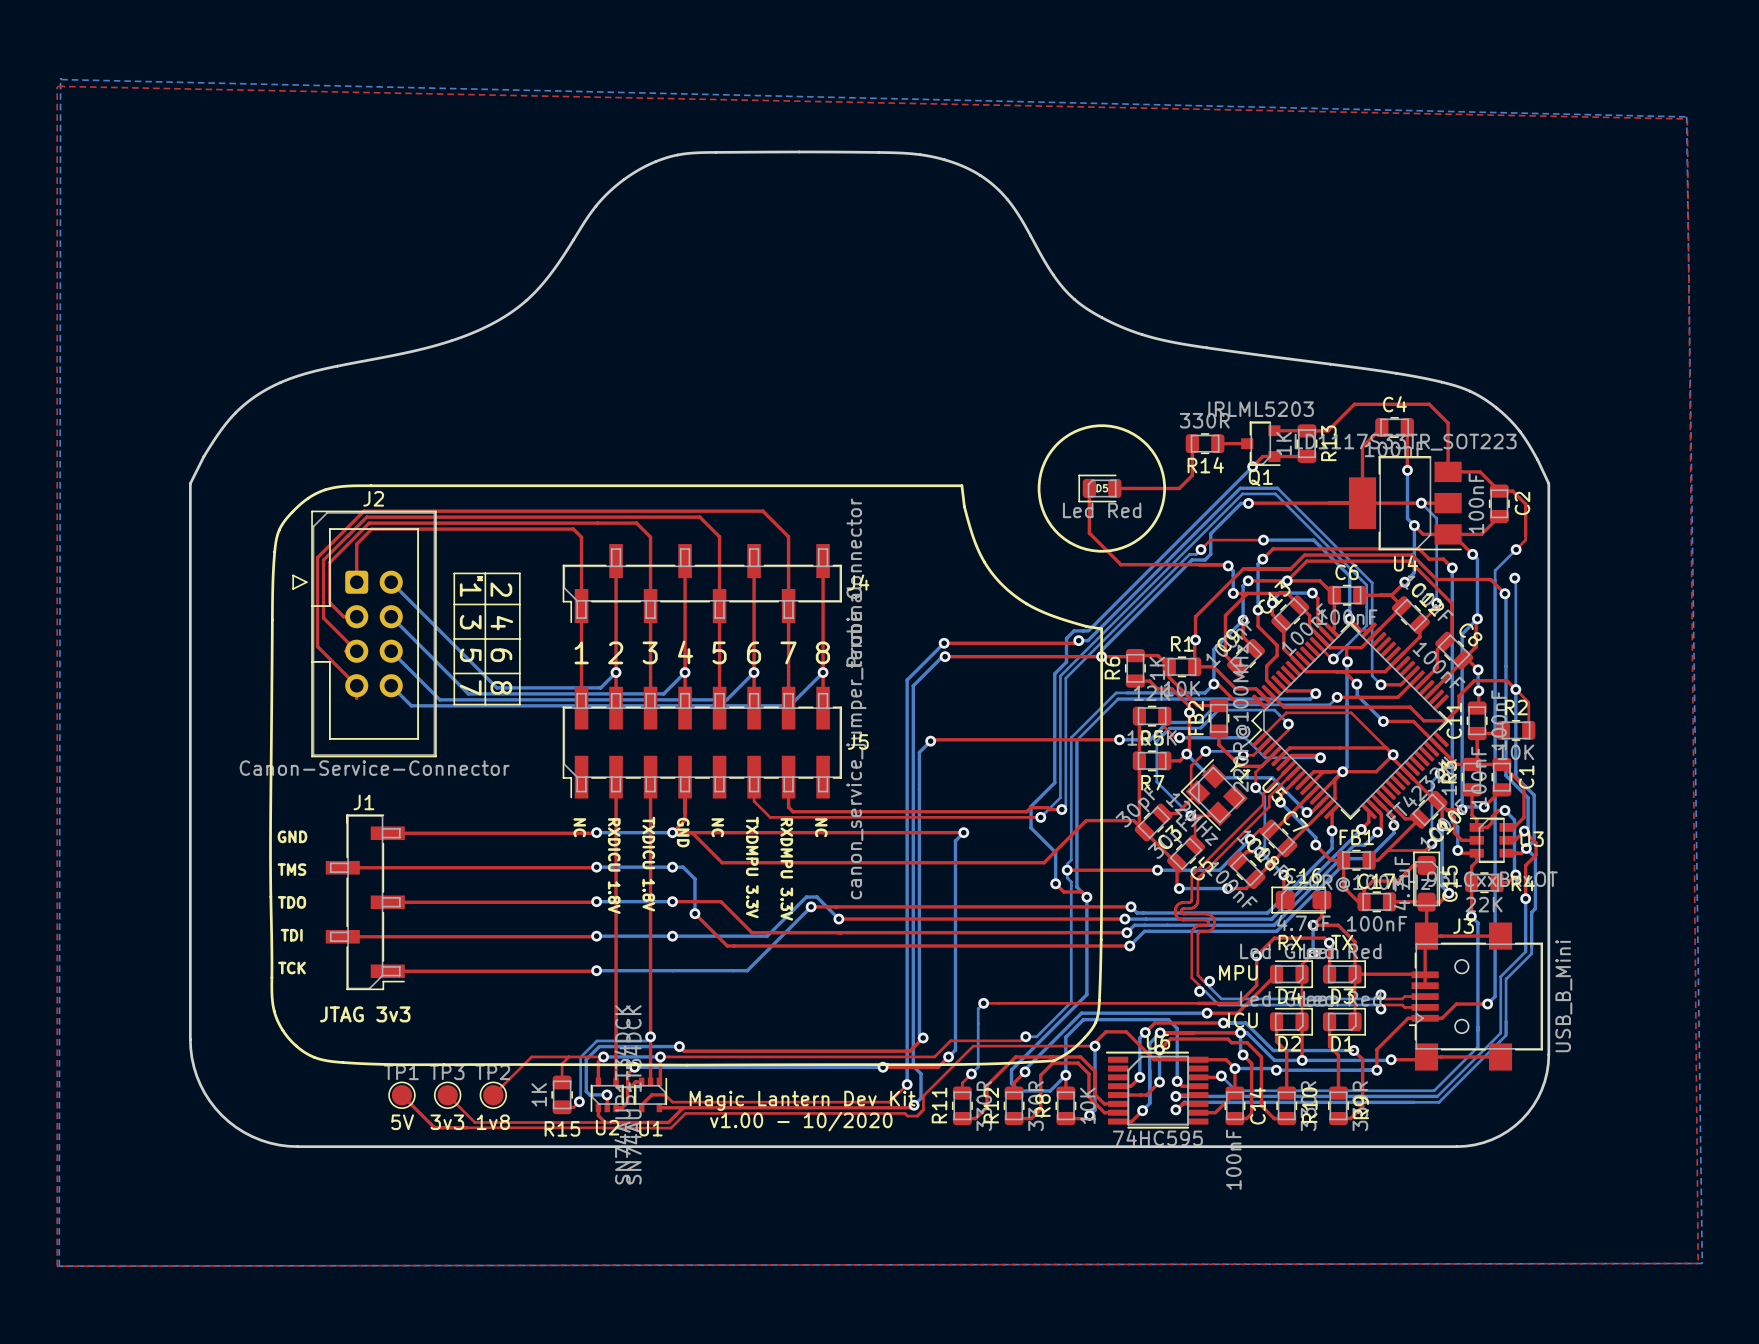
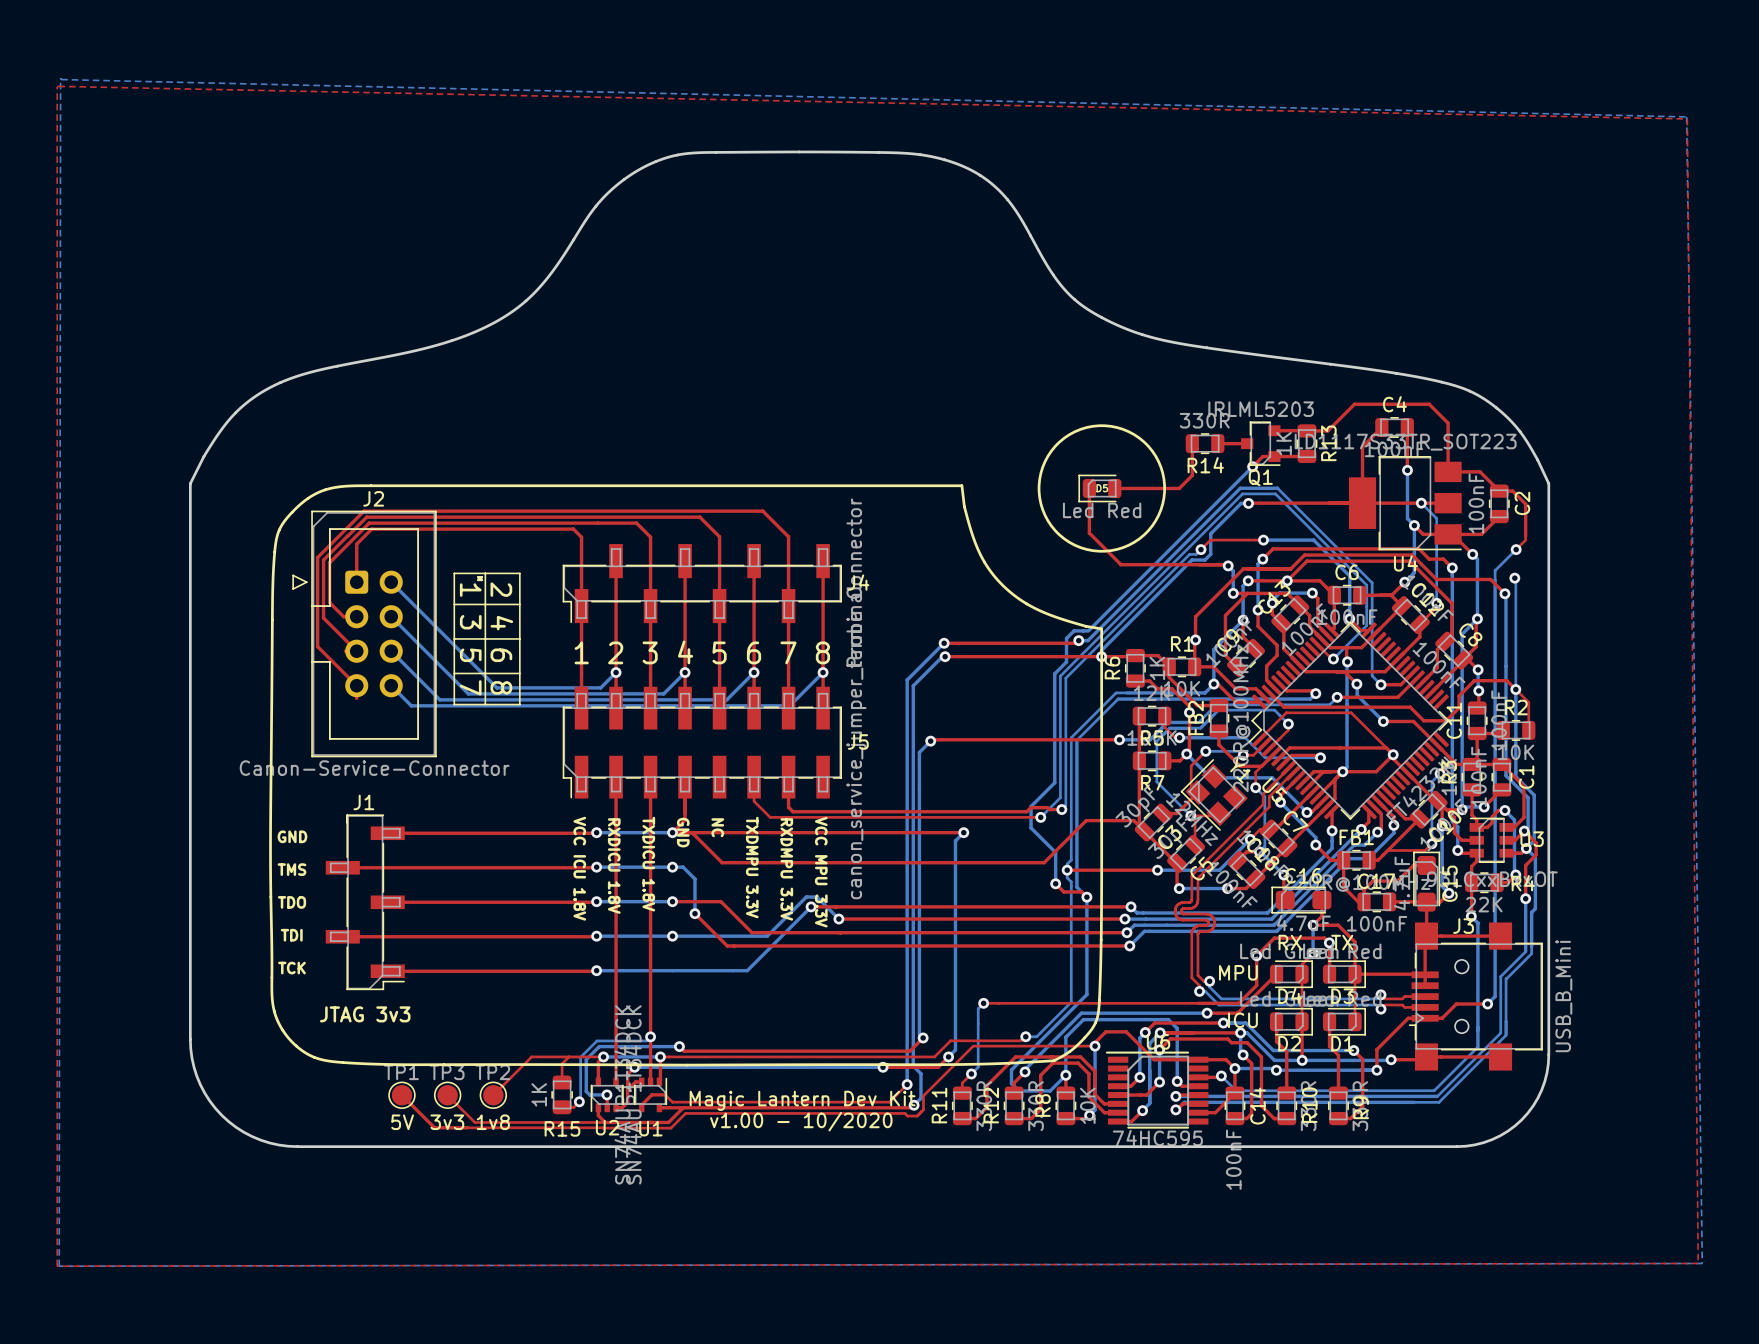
text: NC (579, 827) -> none
text: NC (821, 827) -> none
text: none -> VCC ICU 1.8V (579, 868)
text: none -> VCC MPU 3.3V (821, 872)

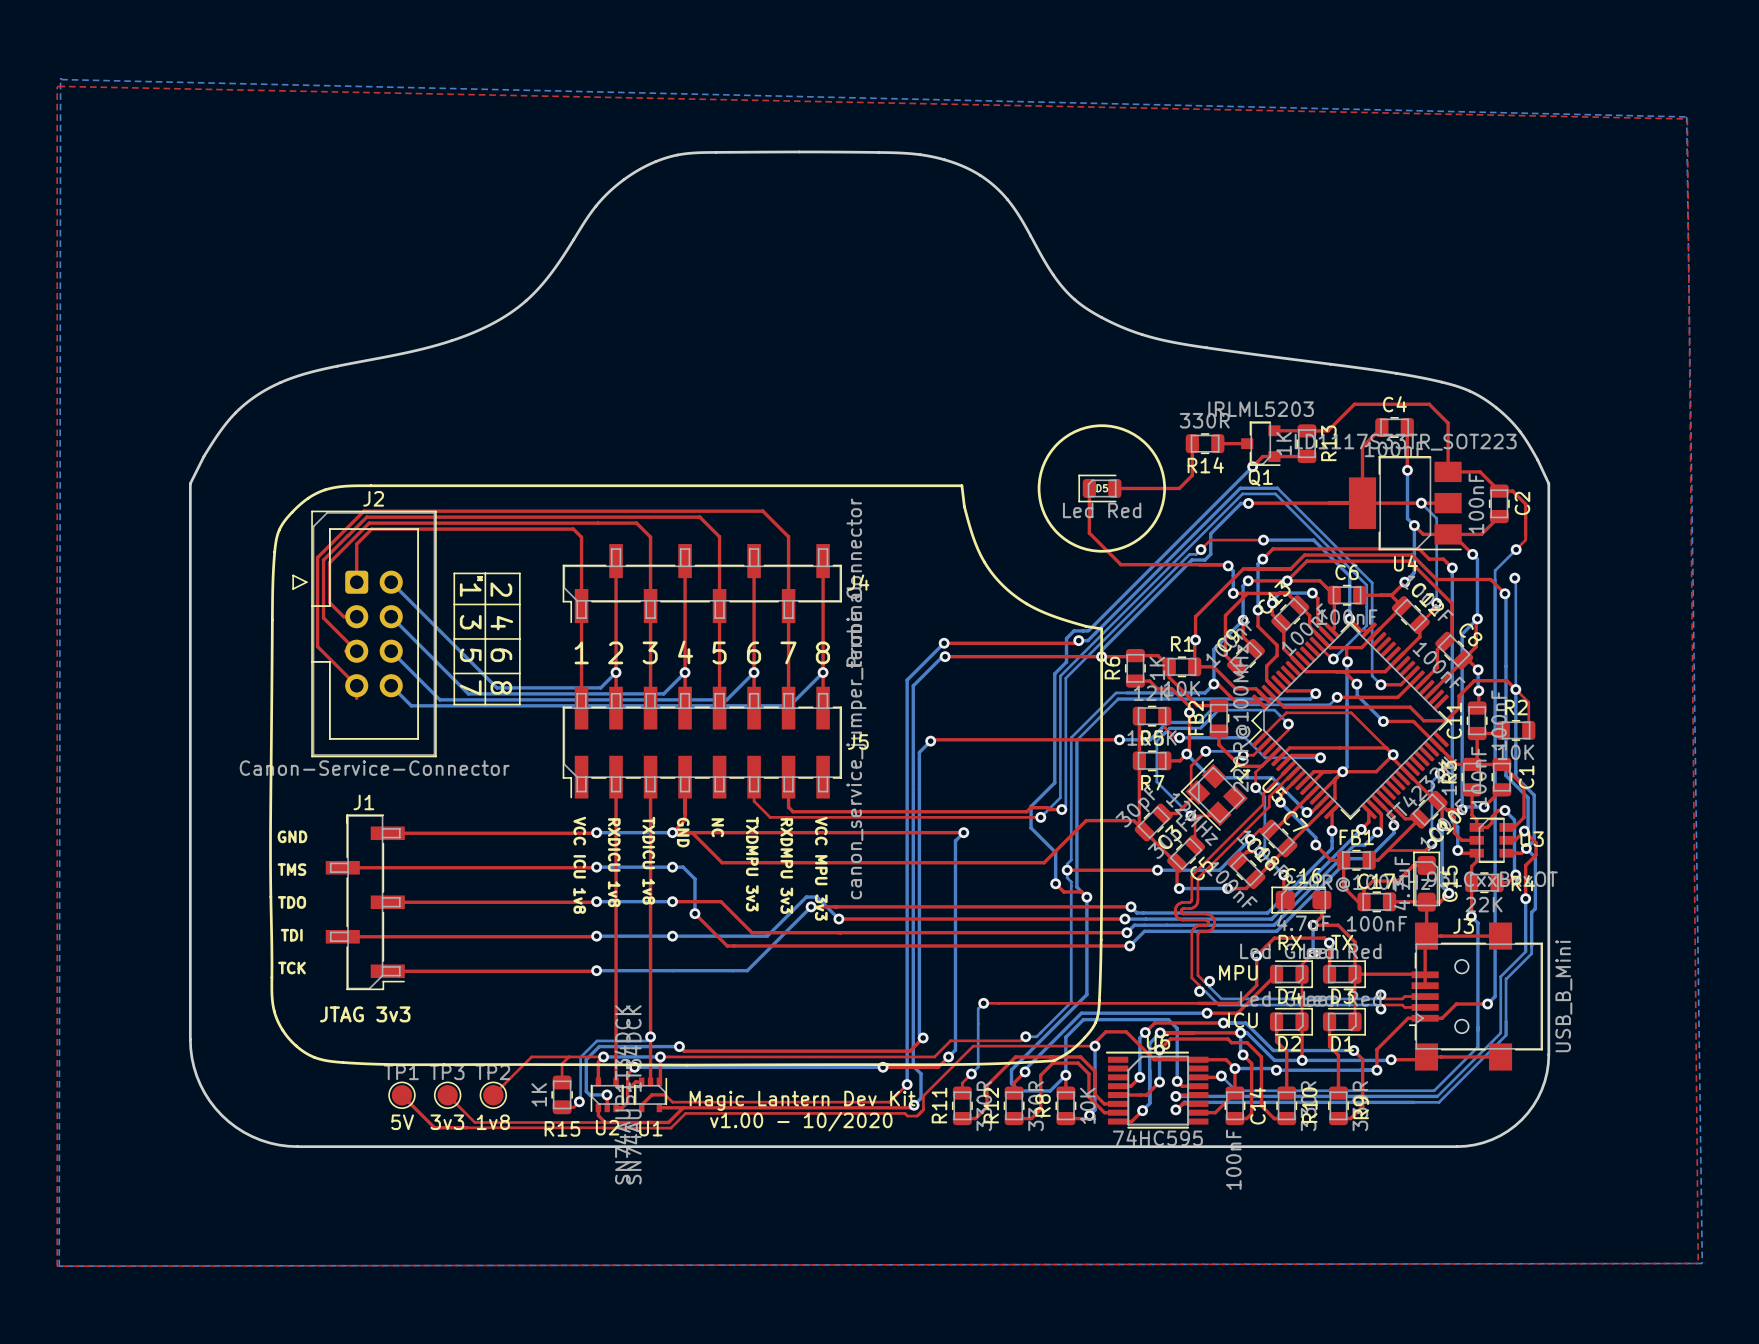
text: TXDICU 1.8V (648, 864) -> TXDICU 1v8 (648, 860)
text: RXDICU 1.8V (614, 866) -> RXDICU 1v8 (614, 862)
text: TXDMPU 3.3V (752, 867) -> TXDMPU 3v3 (752, 864)
text: VCC ICU 1.8V (579, 868) -> VCC ICU 1v8 (579, 865)
text: RXDMPU 3.3V (786, 869) -> RXDMPU 3v3 (786, 866)
text: VCC MPU 3.3V (821, 872) -> VCC MPU 3v3 (821, 868)

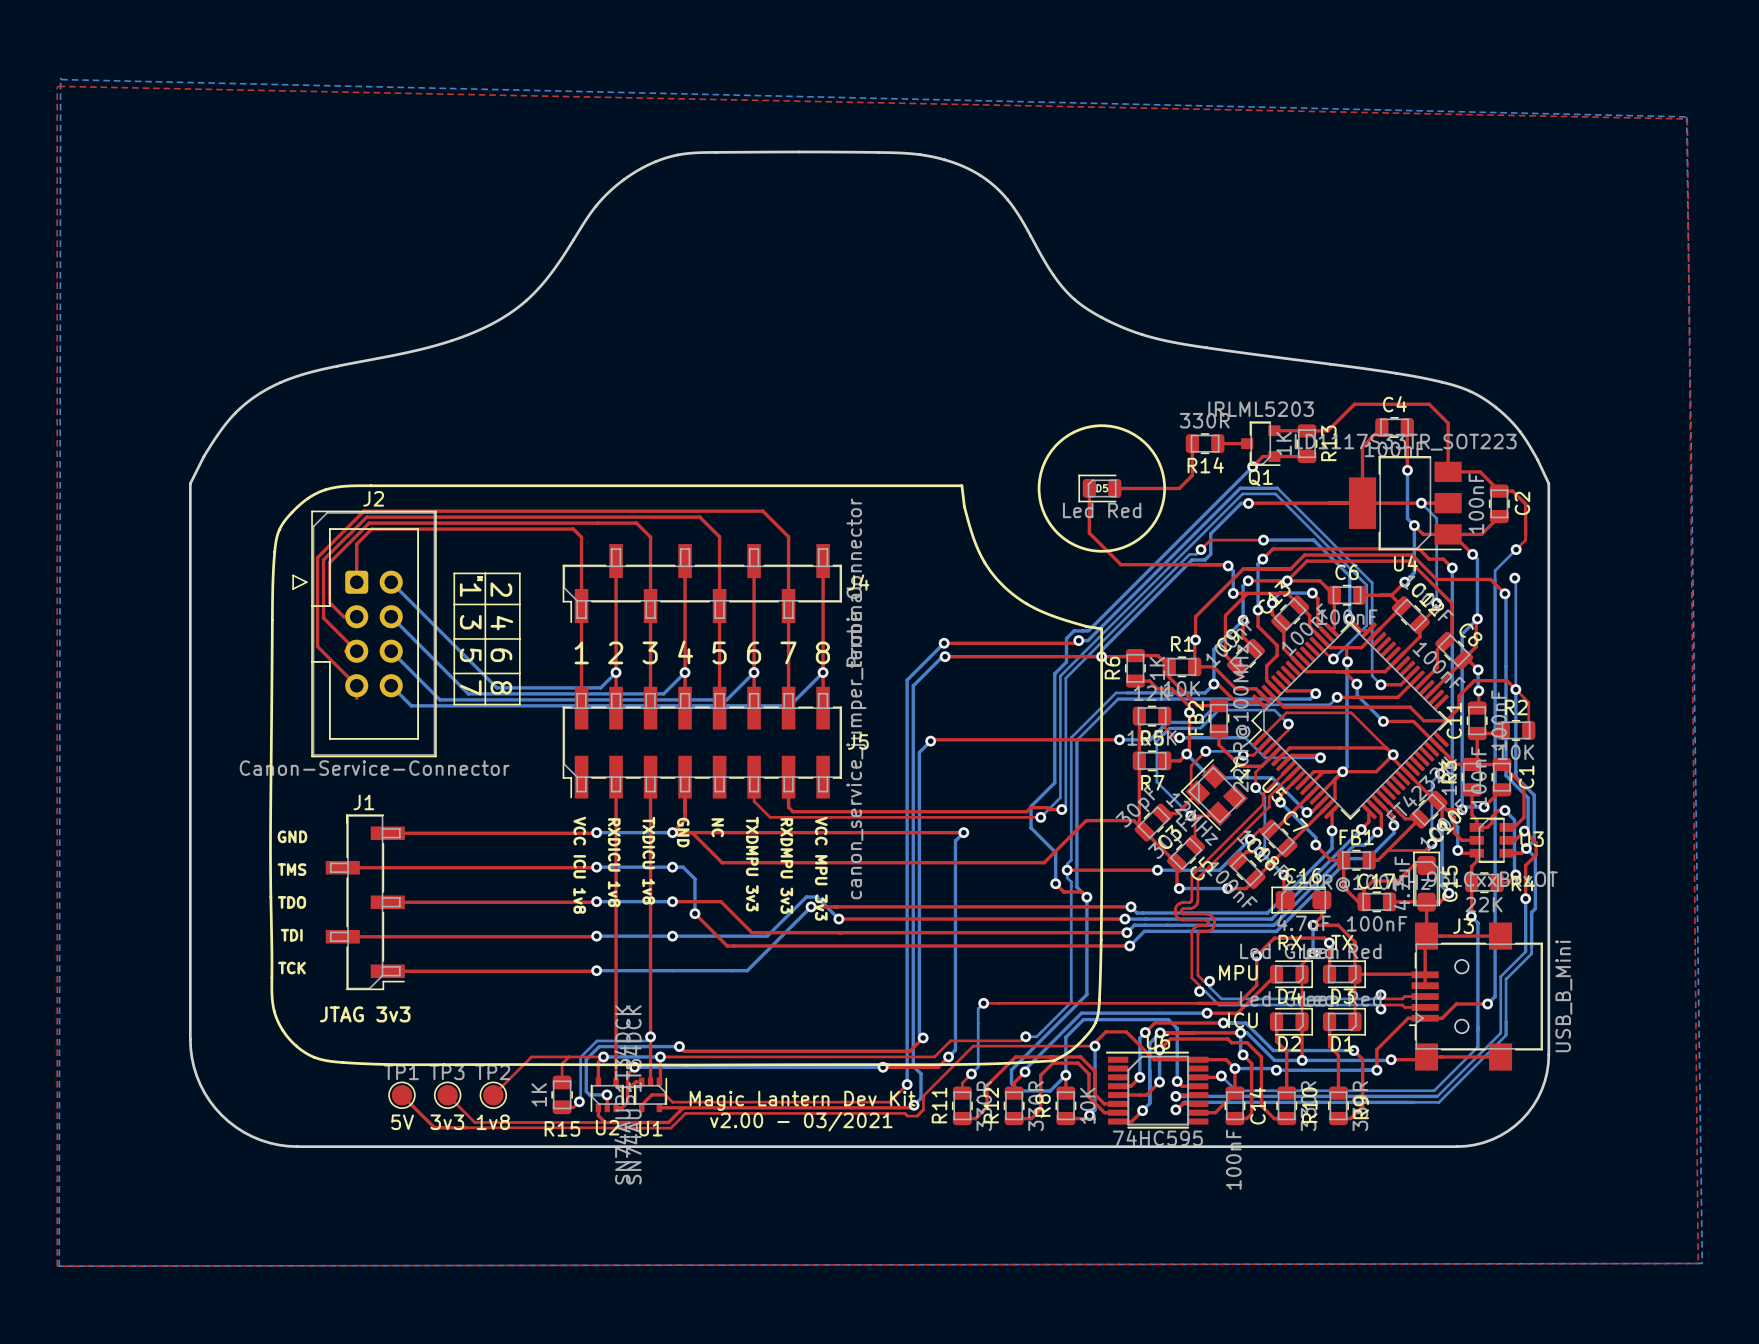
text: v1.00 - 10/2020 (801, 1121) -> v2.00 - 03/2021 (801, 1121)

